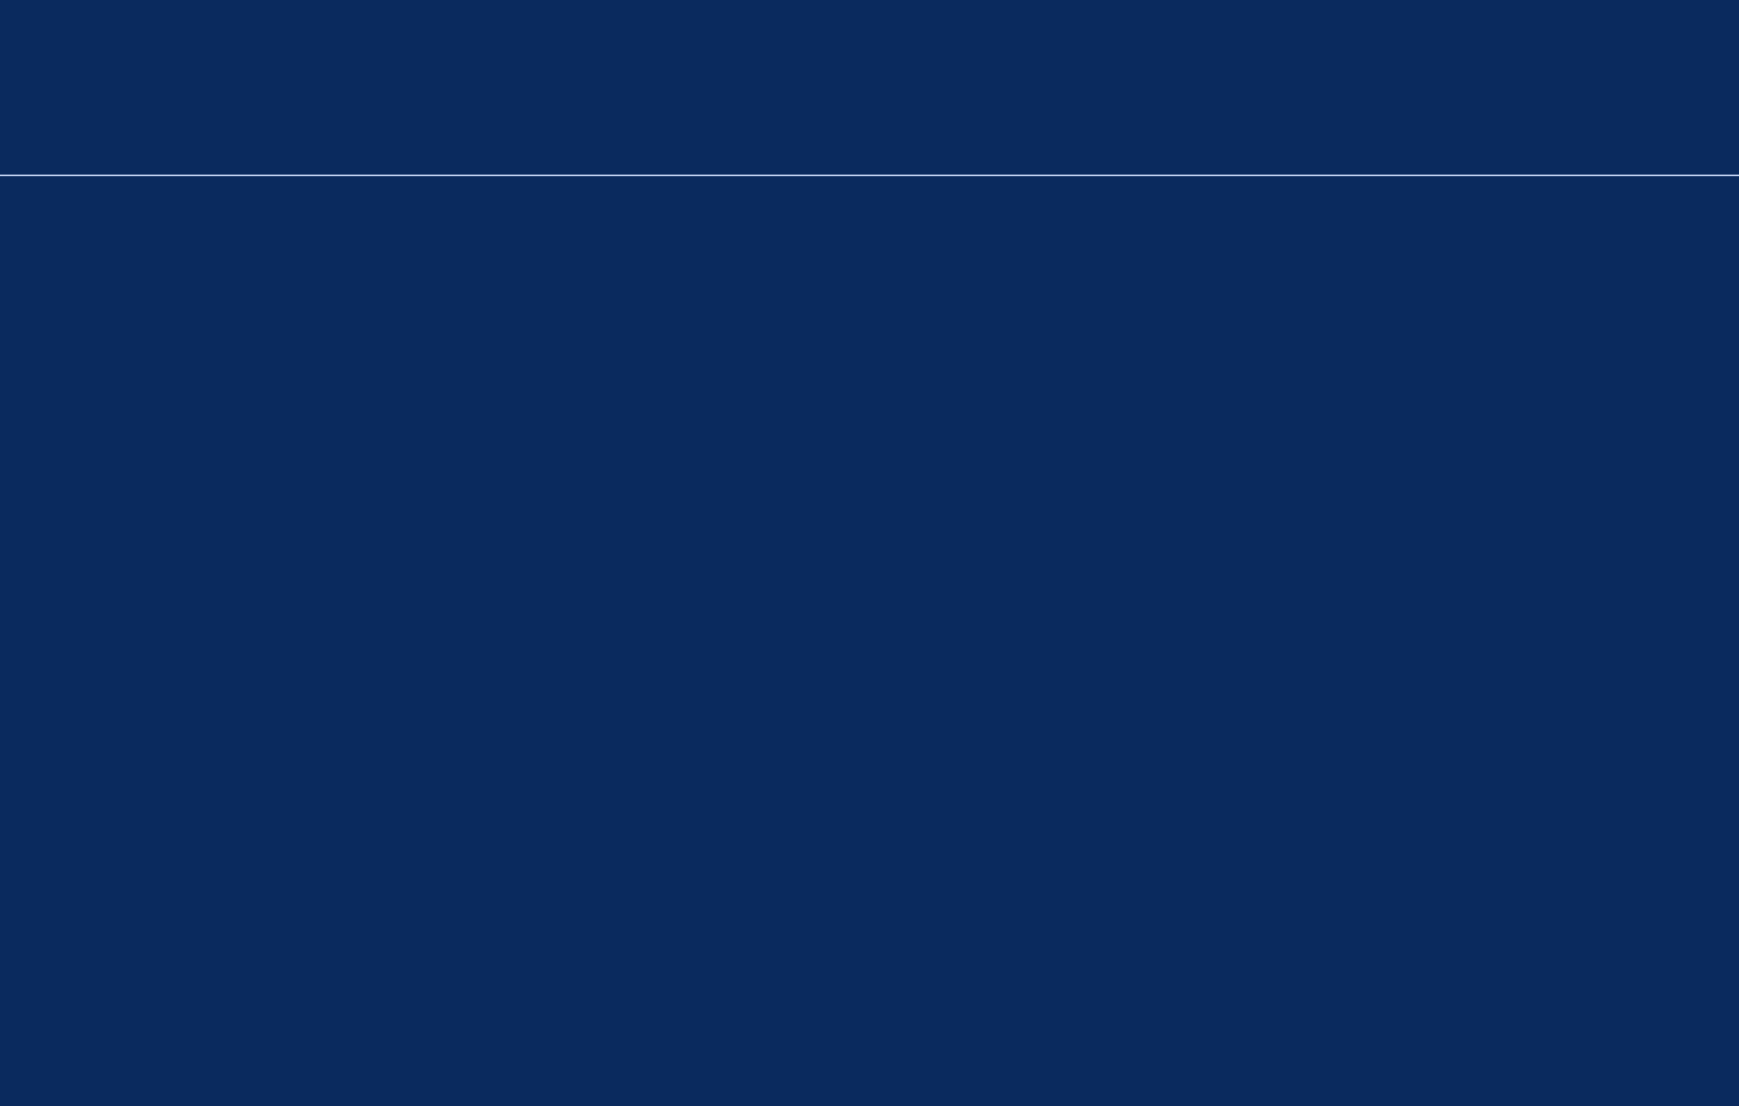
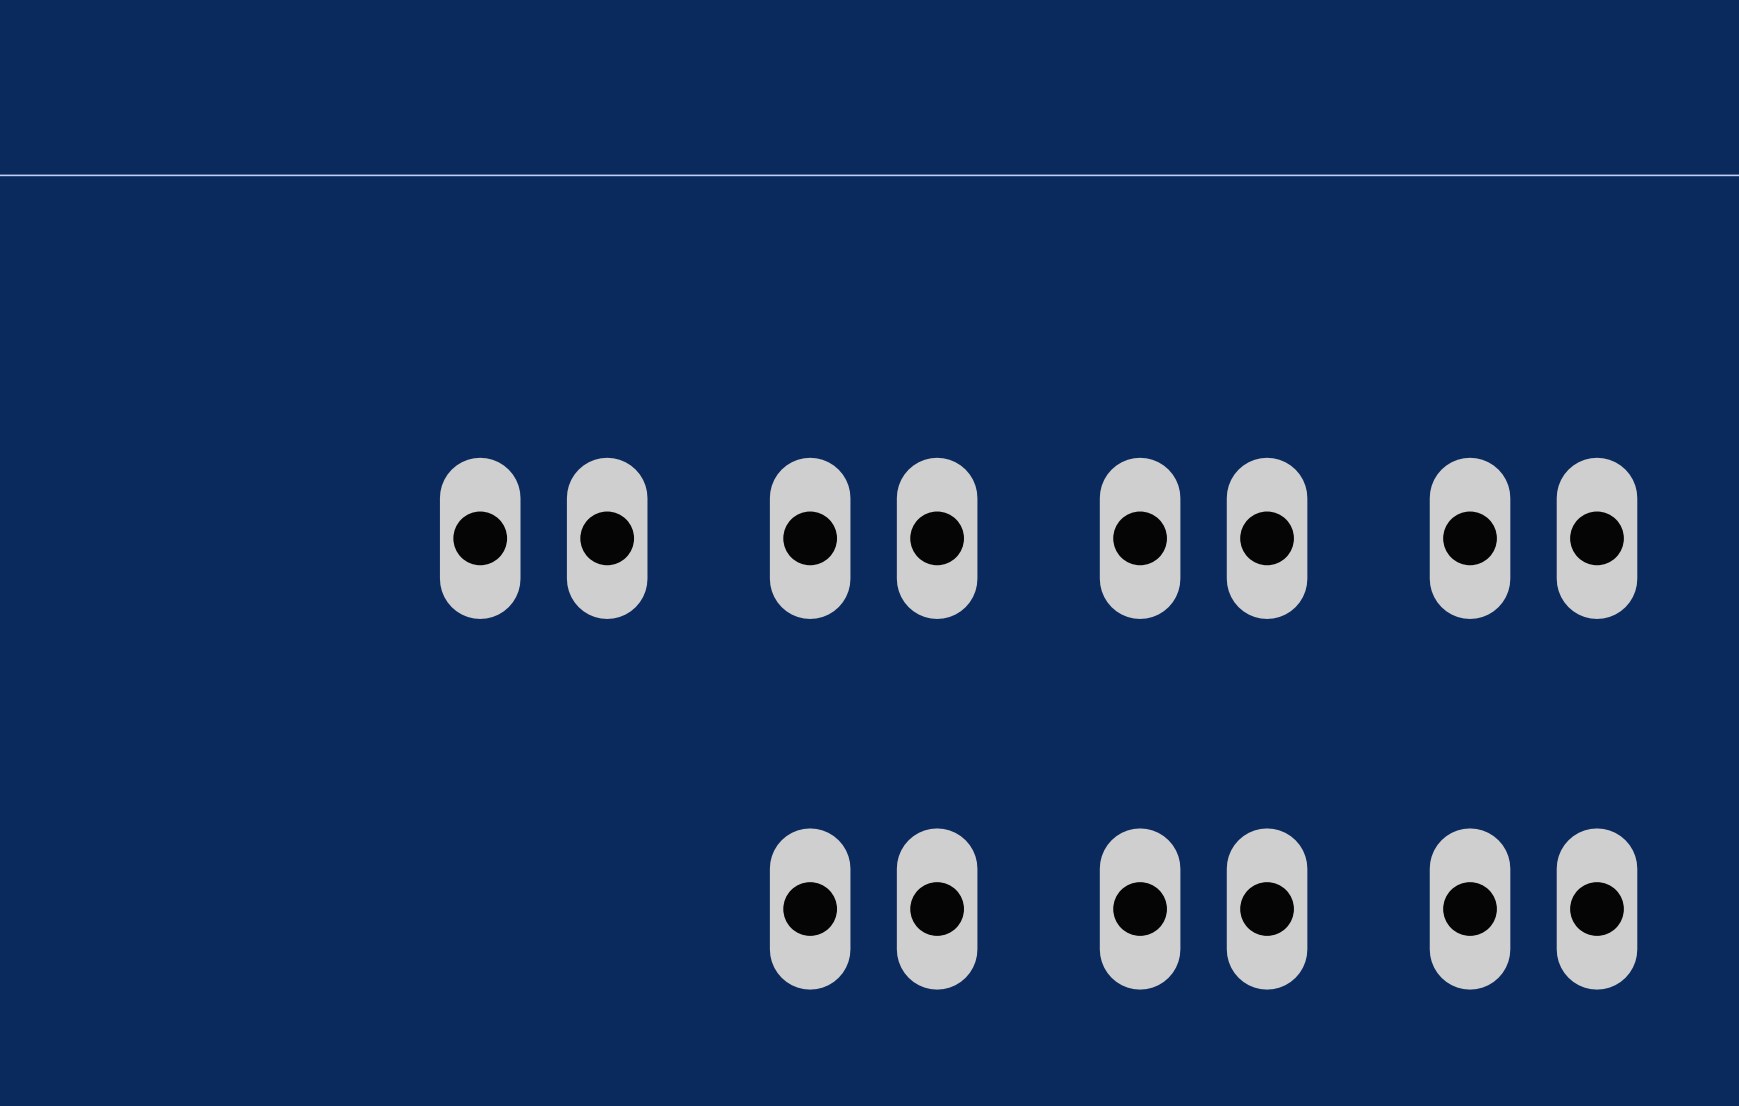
part: none -> (543, 538)
part: none -> (873, 538)
part: none -> (1203, 538)
part: none -> (1533, 538)
part: none -> (873, 909)
part: none -> (1203, 909)
part: none -> (1533, 909)

